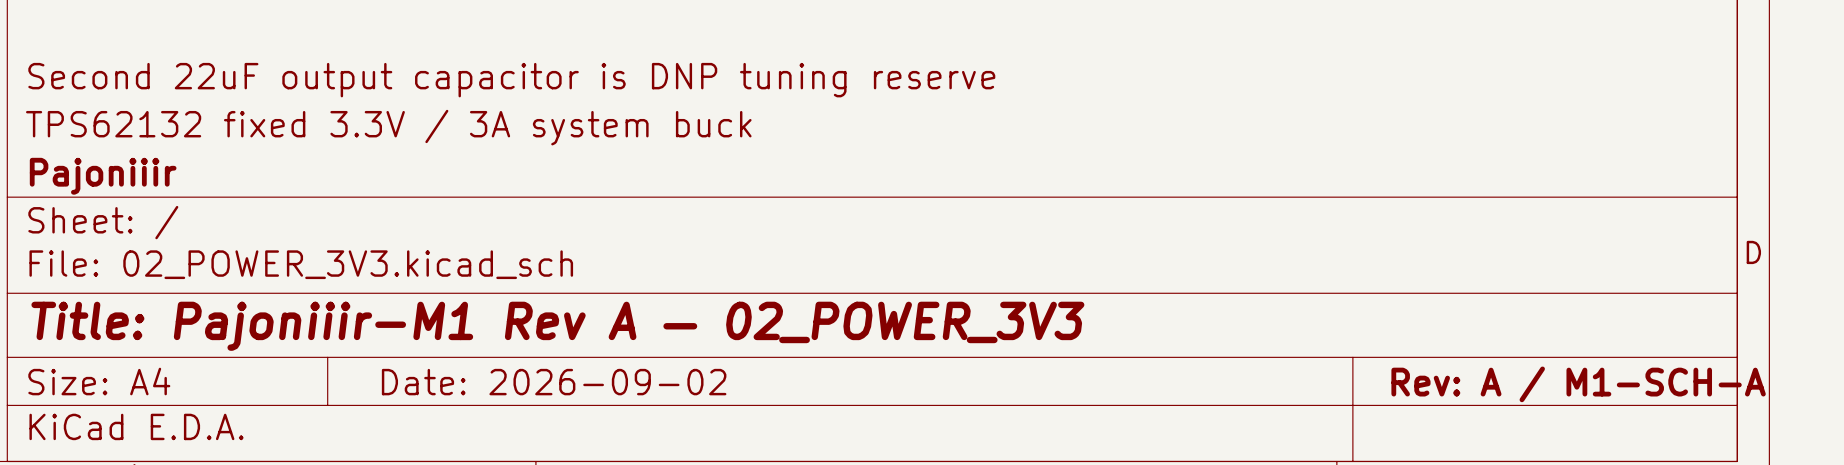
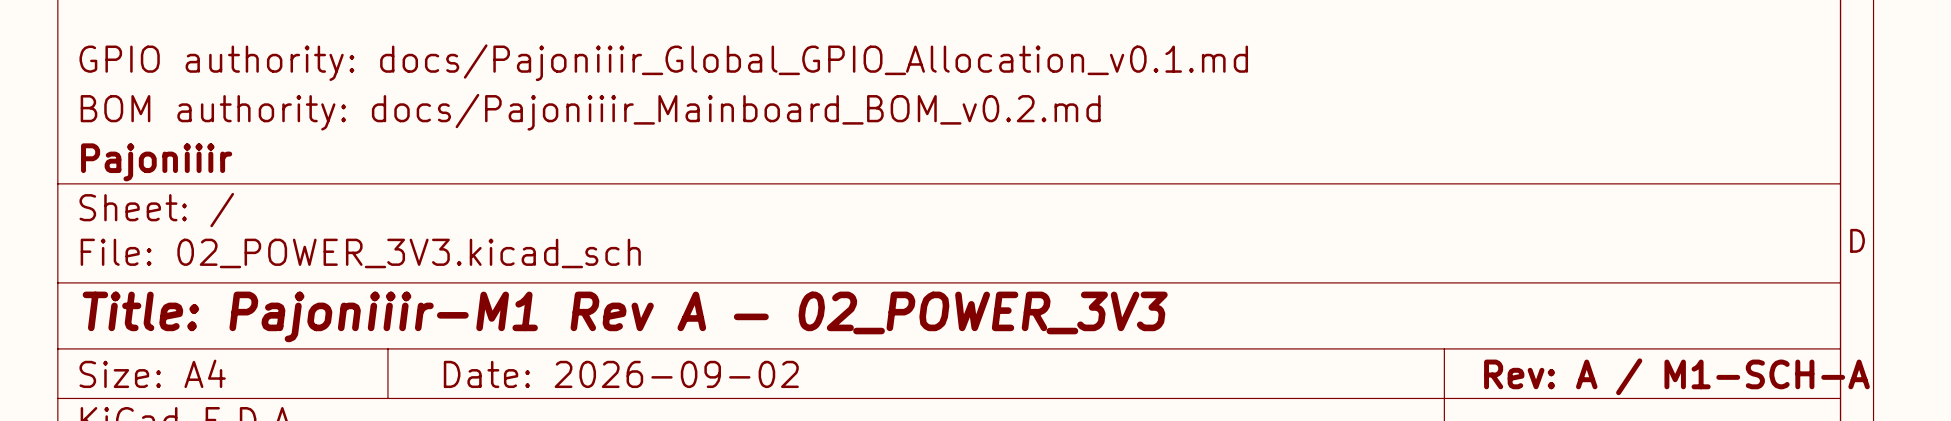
title block: Second 22uF output capacitor is DNP tuning reserve (511, 80) -> GPIO authority: docs/Pajoniiir_Global_GPIO_Allocation_v0.1.md (663, 62)
title block: TPS62132 fixed 3.3V / 3A system buck (388, 127) -> BOM authority: docs/Pajoniiir_Mainboard_BOM_v0.2.md (590, 112)

